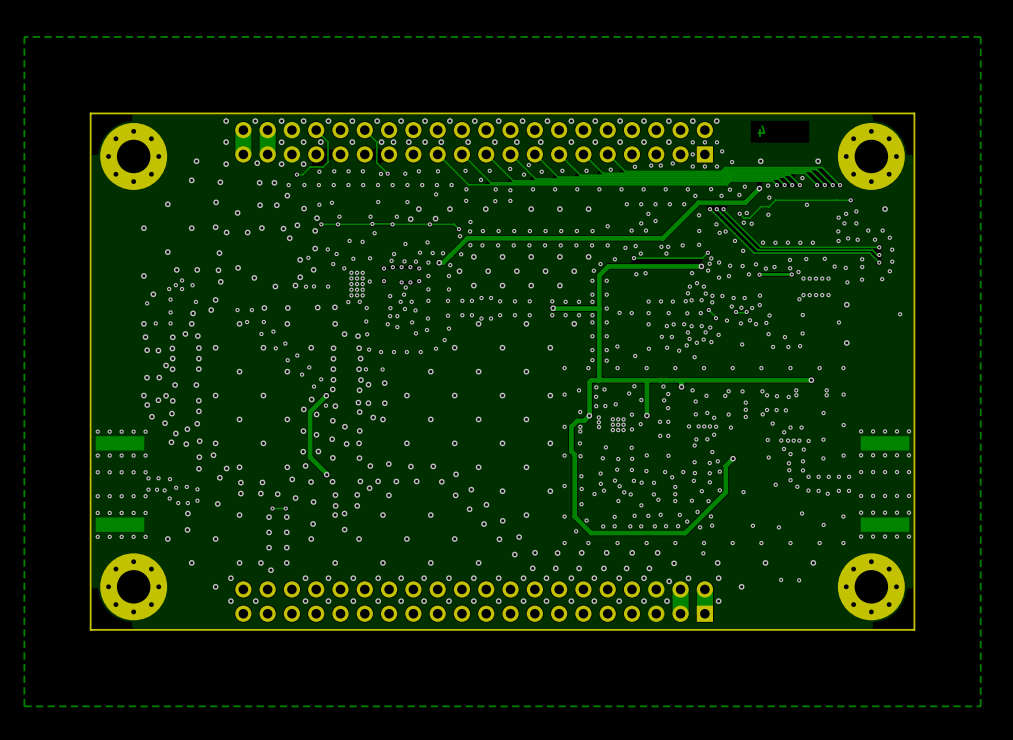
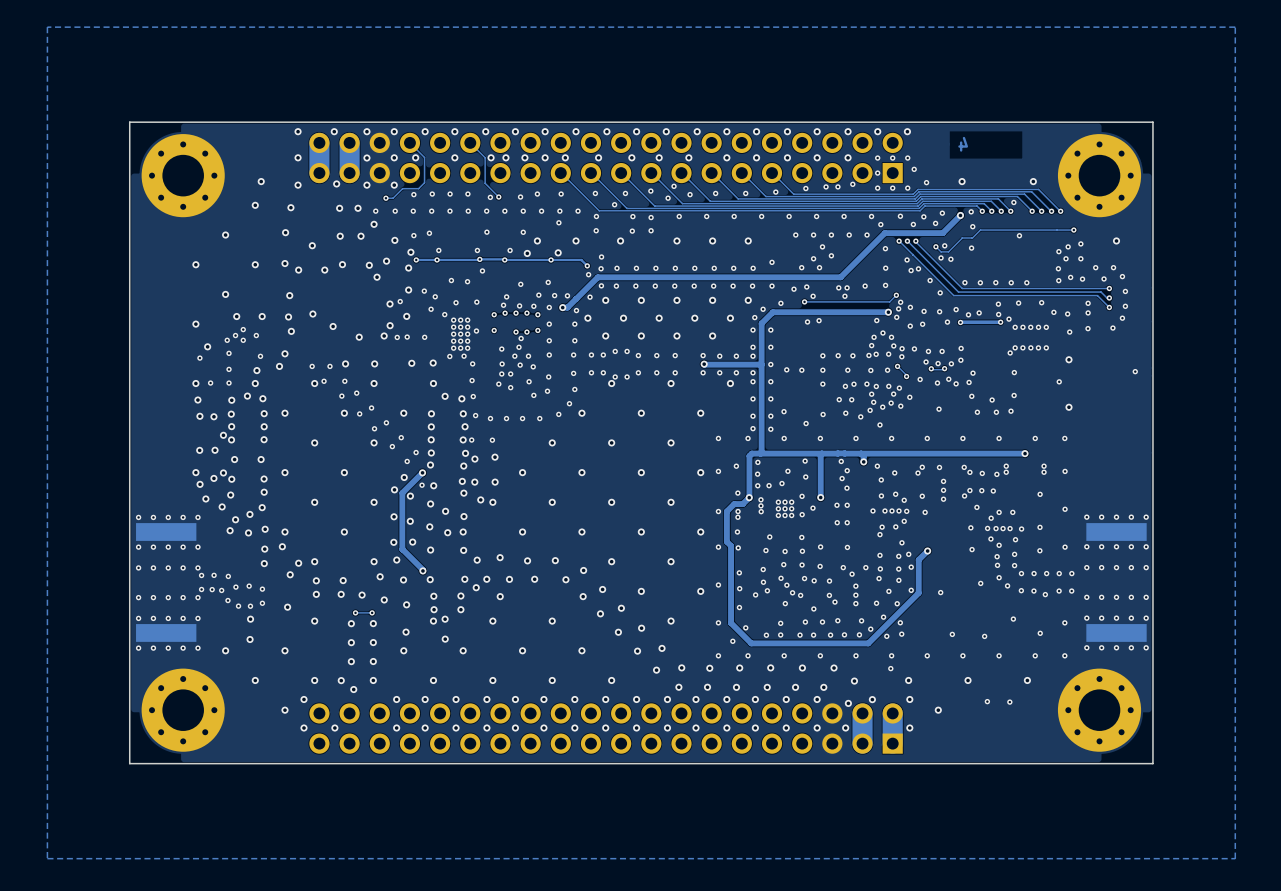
via: (604, 389) -> none
via: (629, 393) -> none
via: none -> (787, 471)
via: none -> (805, 477)
via: (641, 400) -> none

